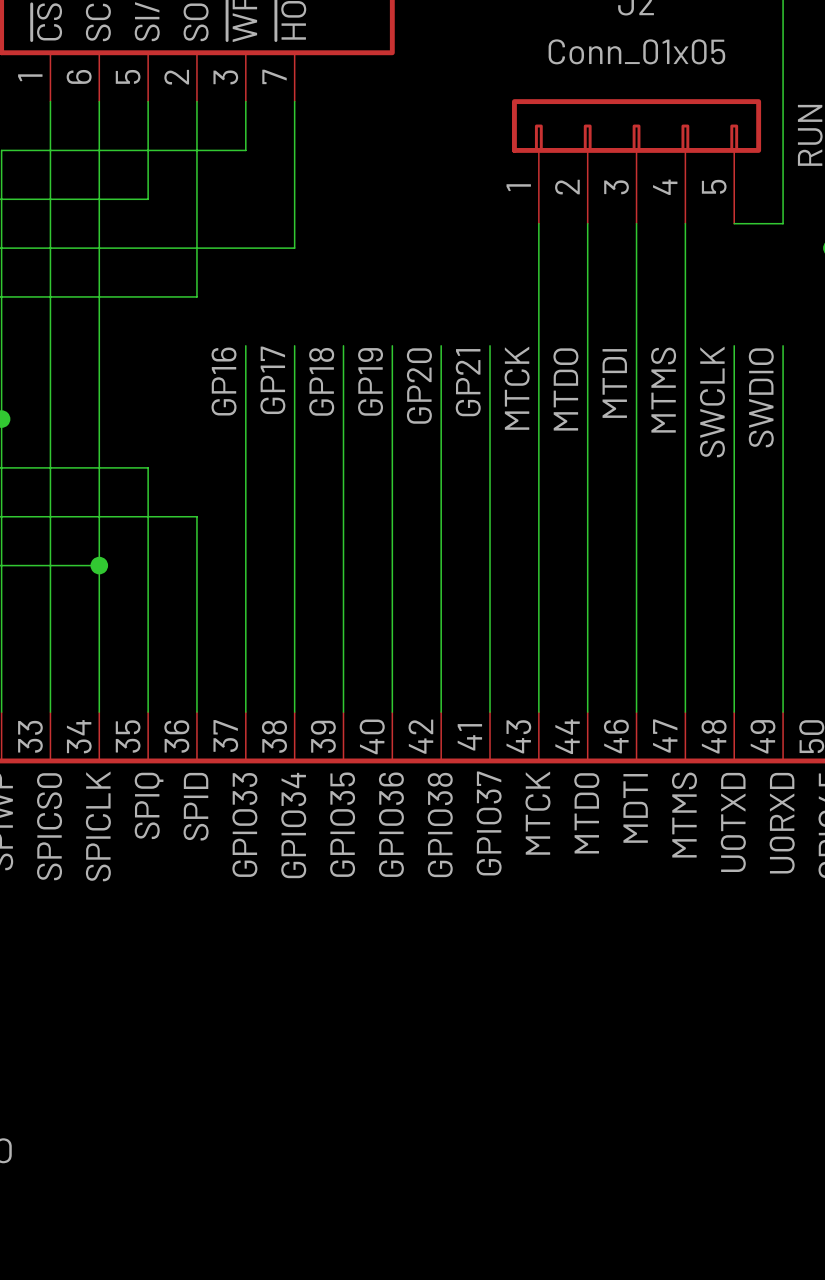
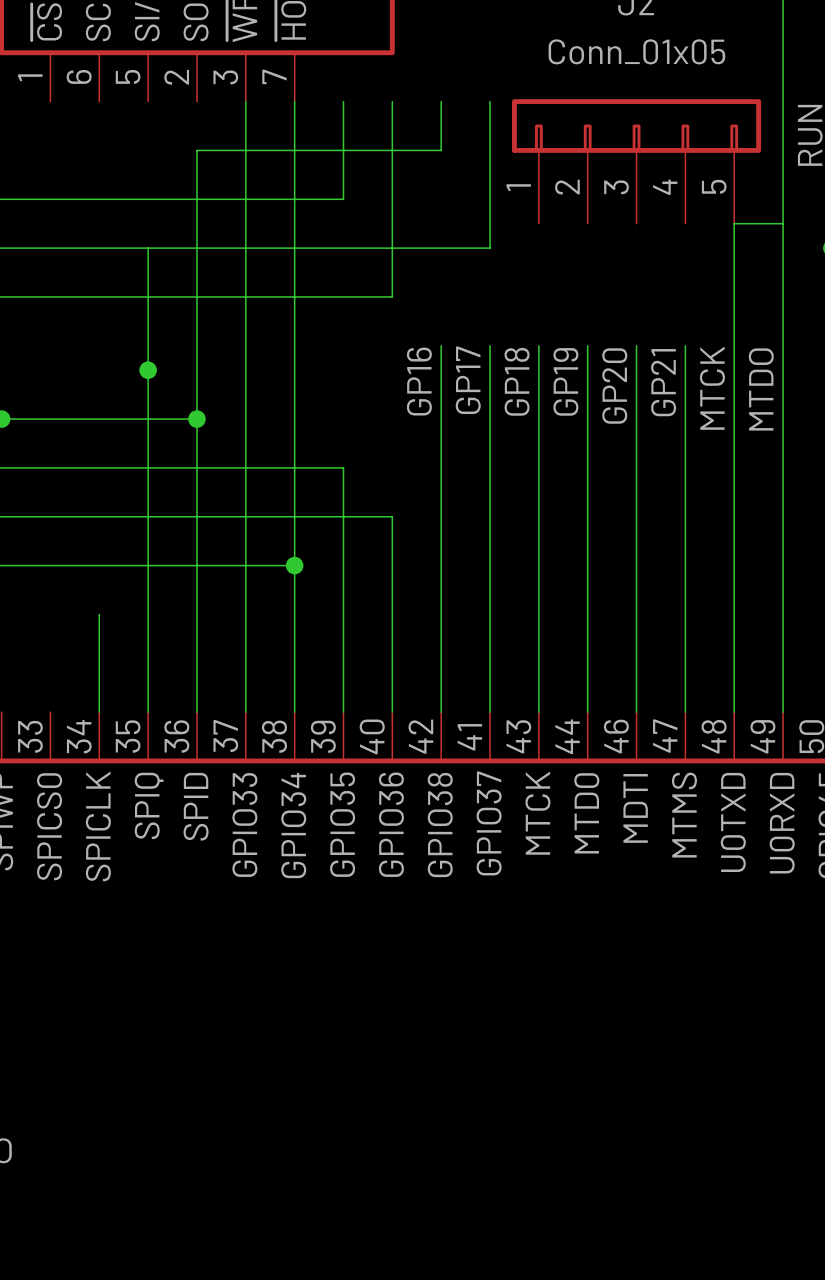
wire: (50, 101) (50, 712) -> none
wire: (99, 101) (99, 614) -> none
wire: (148, 101) (148, 199) -> (343, 101) (343, 199) (148, 199)
wire: (196, 101) (196, 150) (1, 150) (1, 712) -> none
wire: none -> (441, 101) (441, 150) (245, 150) (245, 345)
wire: none -> (490, 101) (490, 248) (294, 248) (294, 345)
wire: (538, 223) (538, 345) -> (734, 223) (734, 345)
wire: (587, 223) (587, 345) -> (783, 223) (783, 345)
wire: (636, 223) (636, 345) -> none
wire: (685, 223) (685, 345) -> none
wire: (343, 345) (343, 467) -> (148, 248) (148, 467) (343, 467)
wire: (392, 345) (392, 516) -> (392, 101) (392, 296) (196, 296) (196, 516) (392, 516)
junction: none -> (148, 370)
label: GP17 (272, 380) -> none
label: GP16 (224, 381) -> none
label: GP18 (321, 381) -> none
label: GP19 (370, 381) -> none
label: GP21 (468, 382) -> GP17 (468, 380)
label: MTDI (614, 383) -> GP20 (614, 386)
label: GP20 (419, 386) -> GP16 (419, 381)
label: MTCK (517, 388) -> GP18 (517, 381)
label: MTDO (565, 389) -> GP19 (565, 381)
label: MTMS (663, 390) -> GP21 (663, 382)
label: SWDIO (761, 397) -> MTDO (761, 389)
label: SWCLK (712, 402) -> MTCK (712, 388)
wire: none -> (1, 419) (196, 419)
junction: none -> (196, 419)
wire: none -> (99, 565) (294, 565)
junction: (99, 565) -> none
junction: none -> (294, 565)

